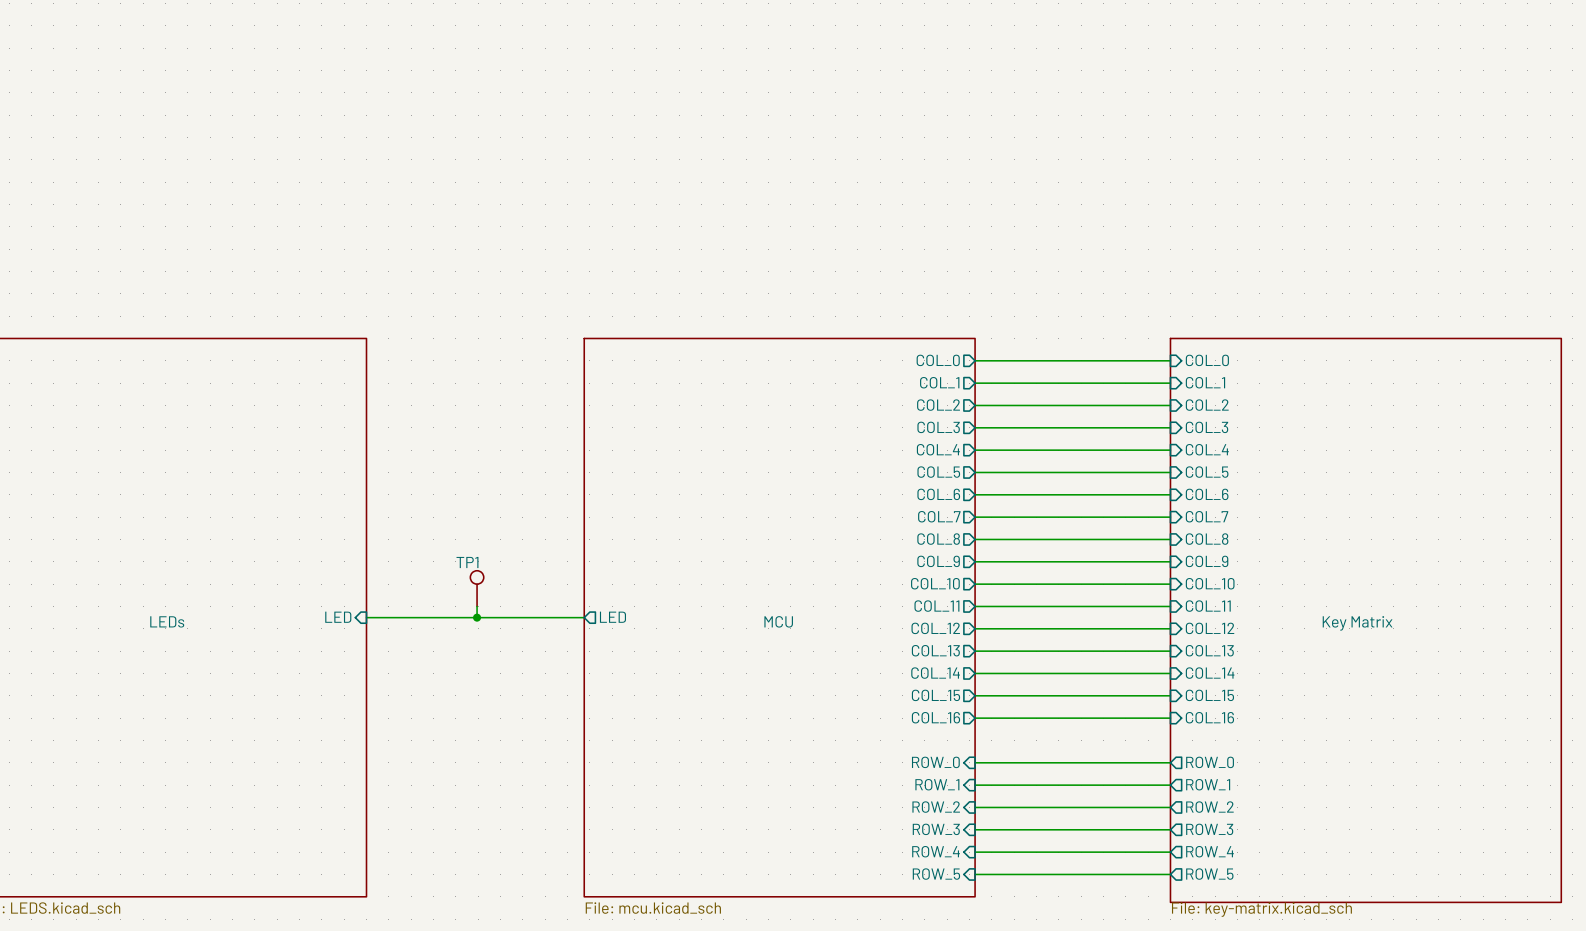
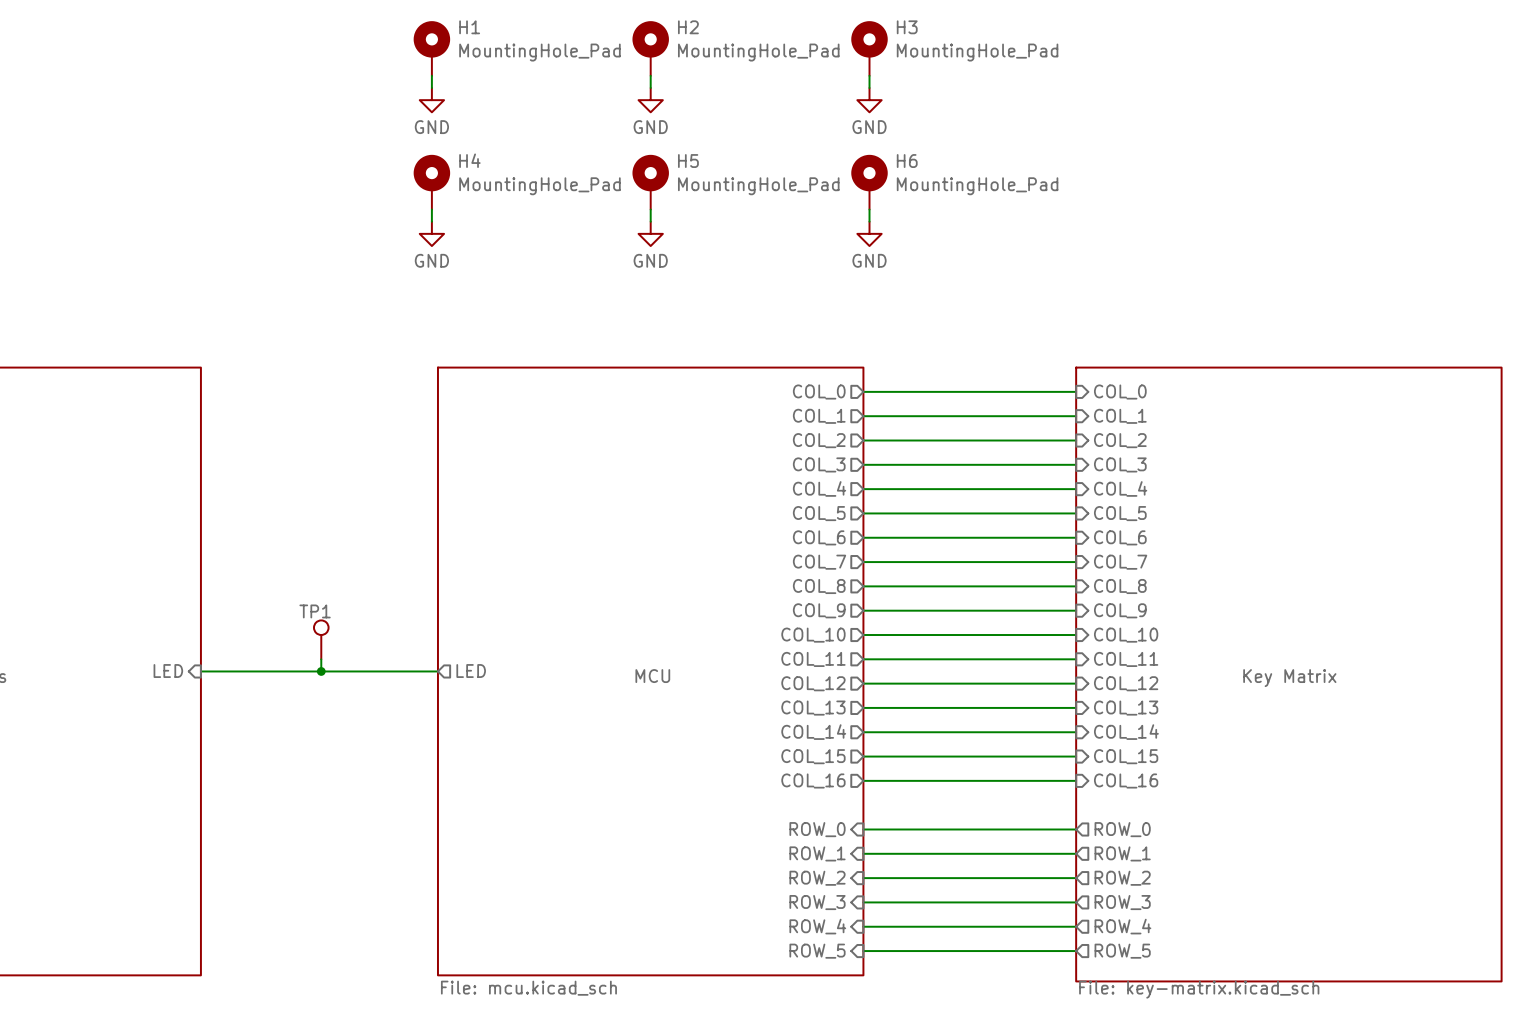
H1: none -> MountingHole_Pad (431, 48)
H2: none -> MountingHole_Pad (650, 48)
H3: none -> MountingHole_Pad (869, 48)
wire: none -> (431, 75) (431, 87)
wire: none -> (650, 75) (650, 87)
wire: none -> (869, 75) (869, 87)
power symbol: none -> GND (431, 100)
power symbol: none -> GND (650, 100)
power symbol: none -> GND (869, 100)
H4: none -> MountingHole_Pad (431, 182)
H5: none -> MountingHole_Pad (650, 182)
H6: none -> MountingHole_Pad (869, 182)
wire: none -> (431, 209) (431, 221)
wire: none -> (650, 209) (650, 221)
wire: none -> (869, 209) (869, 221)
power symbol: none -> GND (431, 233)
power symbol: none -> GND (650, 233)
power symbol: none -> GND (869, 233)

